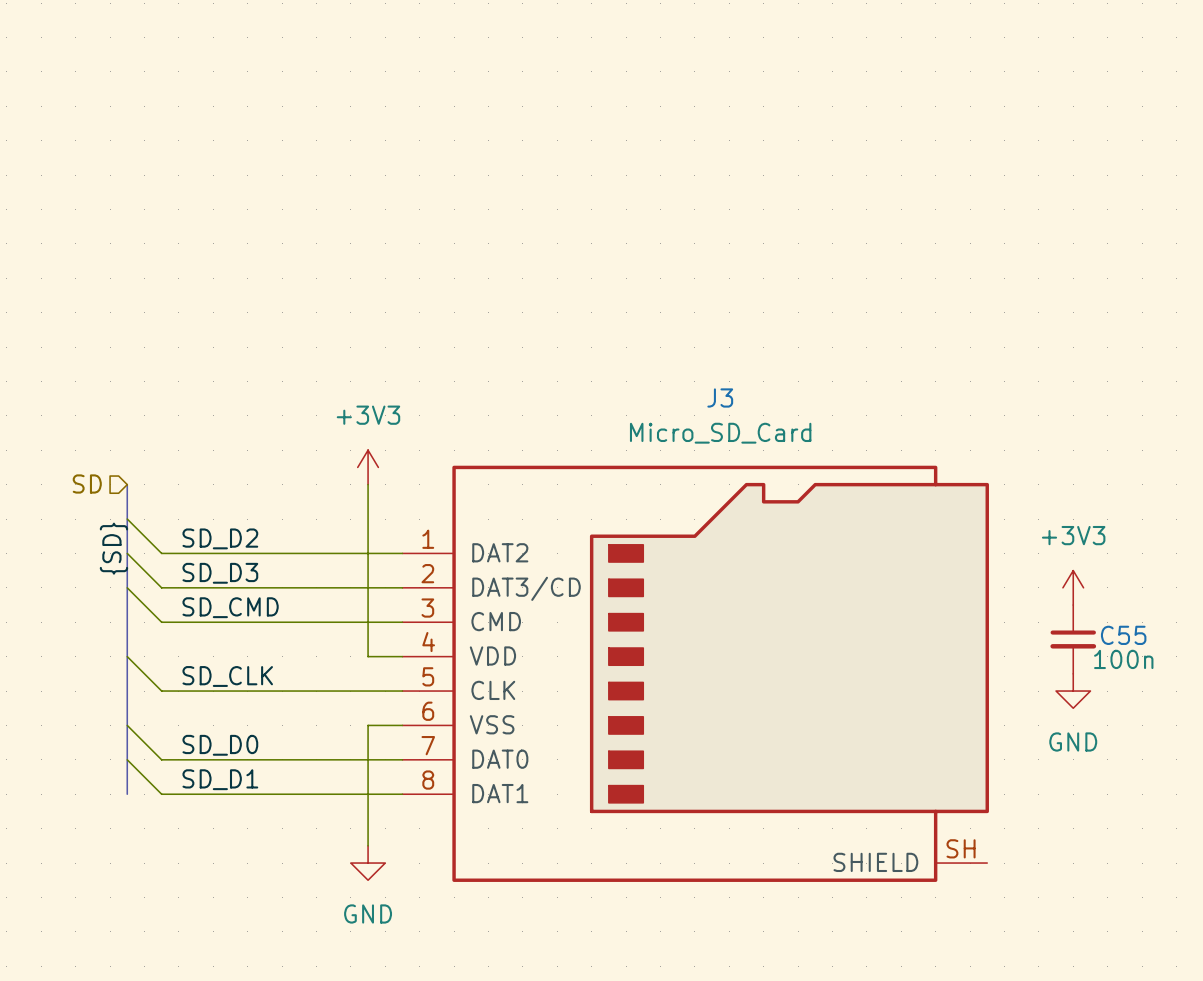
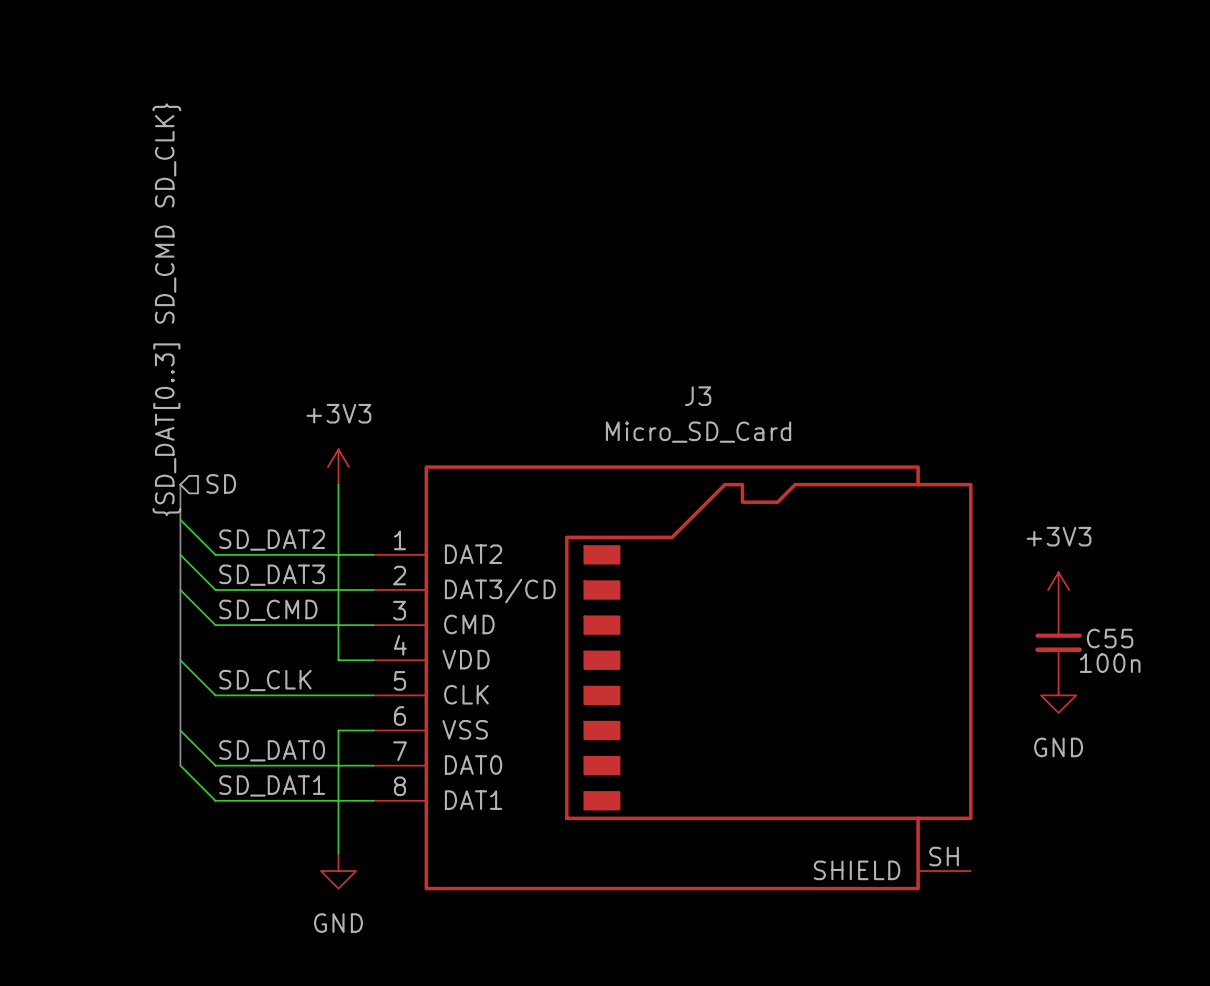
label: none -> {SD_DAT[0..3] SD_CMD SD_CLK} (166, 309)
hierarchical label rotation: 0° (87, 483) -> 180° (221, 483)
hierarchical label position: SD (87, 483) -> SD (221, 483)
bus: (127, 484) (127, 794) -> none
bus: none -> (180, 484) (180, 765)
wire: (127, 519) (161, 553) (247, 553) -> (180, 519) (215, 554)
label: SD_D2 (220, 538) -> none
label: none -> SD_DAT2 (272, 540)
label: {SD} (113, 548) -> none
wire: (127, 553) (161, 587) (247, 587) -> (180, 554) (215, 590)
label: SD_D3 (220, 573) -> none
label: none -> SD_DAT3 (272, 575)
wire: (127, 587) (161, 622) (247, 622) -> (180, 590) (215, 625)
label position: SD_CMD (230, 607) -> SD_CMD (268, 610)
wire: (127, 656) (161, 691) (247, 691) -> (180, 660) (215, 695)
label position: SD_CLK (227, 676) -> SD_CLK (265, 680)
wire: (127, 725) (161, 759) (247, 759) -> (180, 730) (215, 765)
label: SD_D0 (220, 745) -> none
label: none -> SD_DAT0 (272, 750)
wire: (127, 759) (161, 794) (247, 794) -> (180, 765) (215, 800)
label: SD_D1 (220, 779) -> none
label: none -> SD_DAT1 (272, 785)

